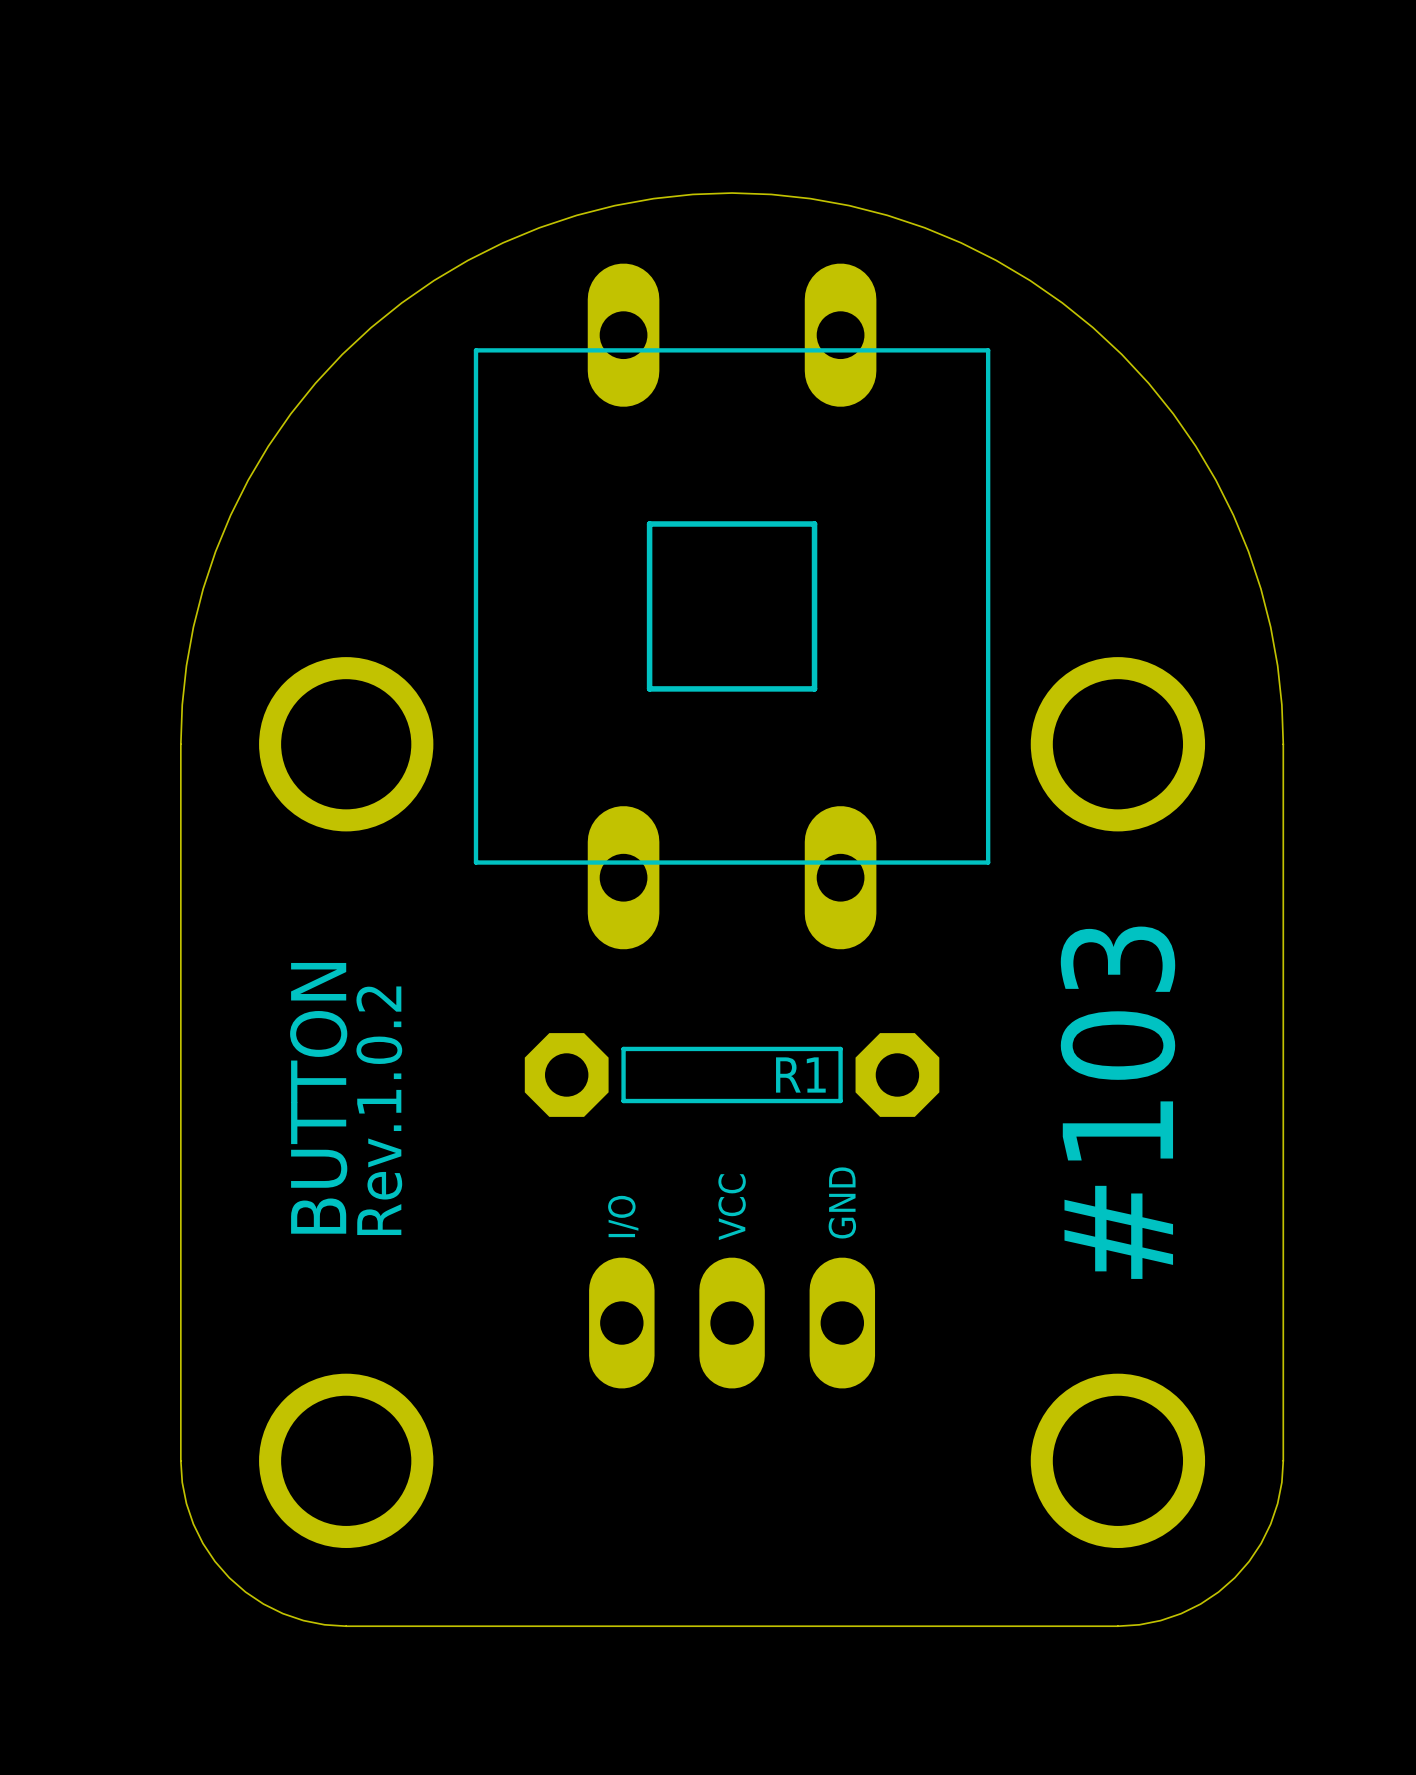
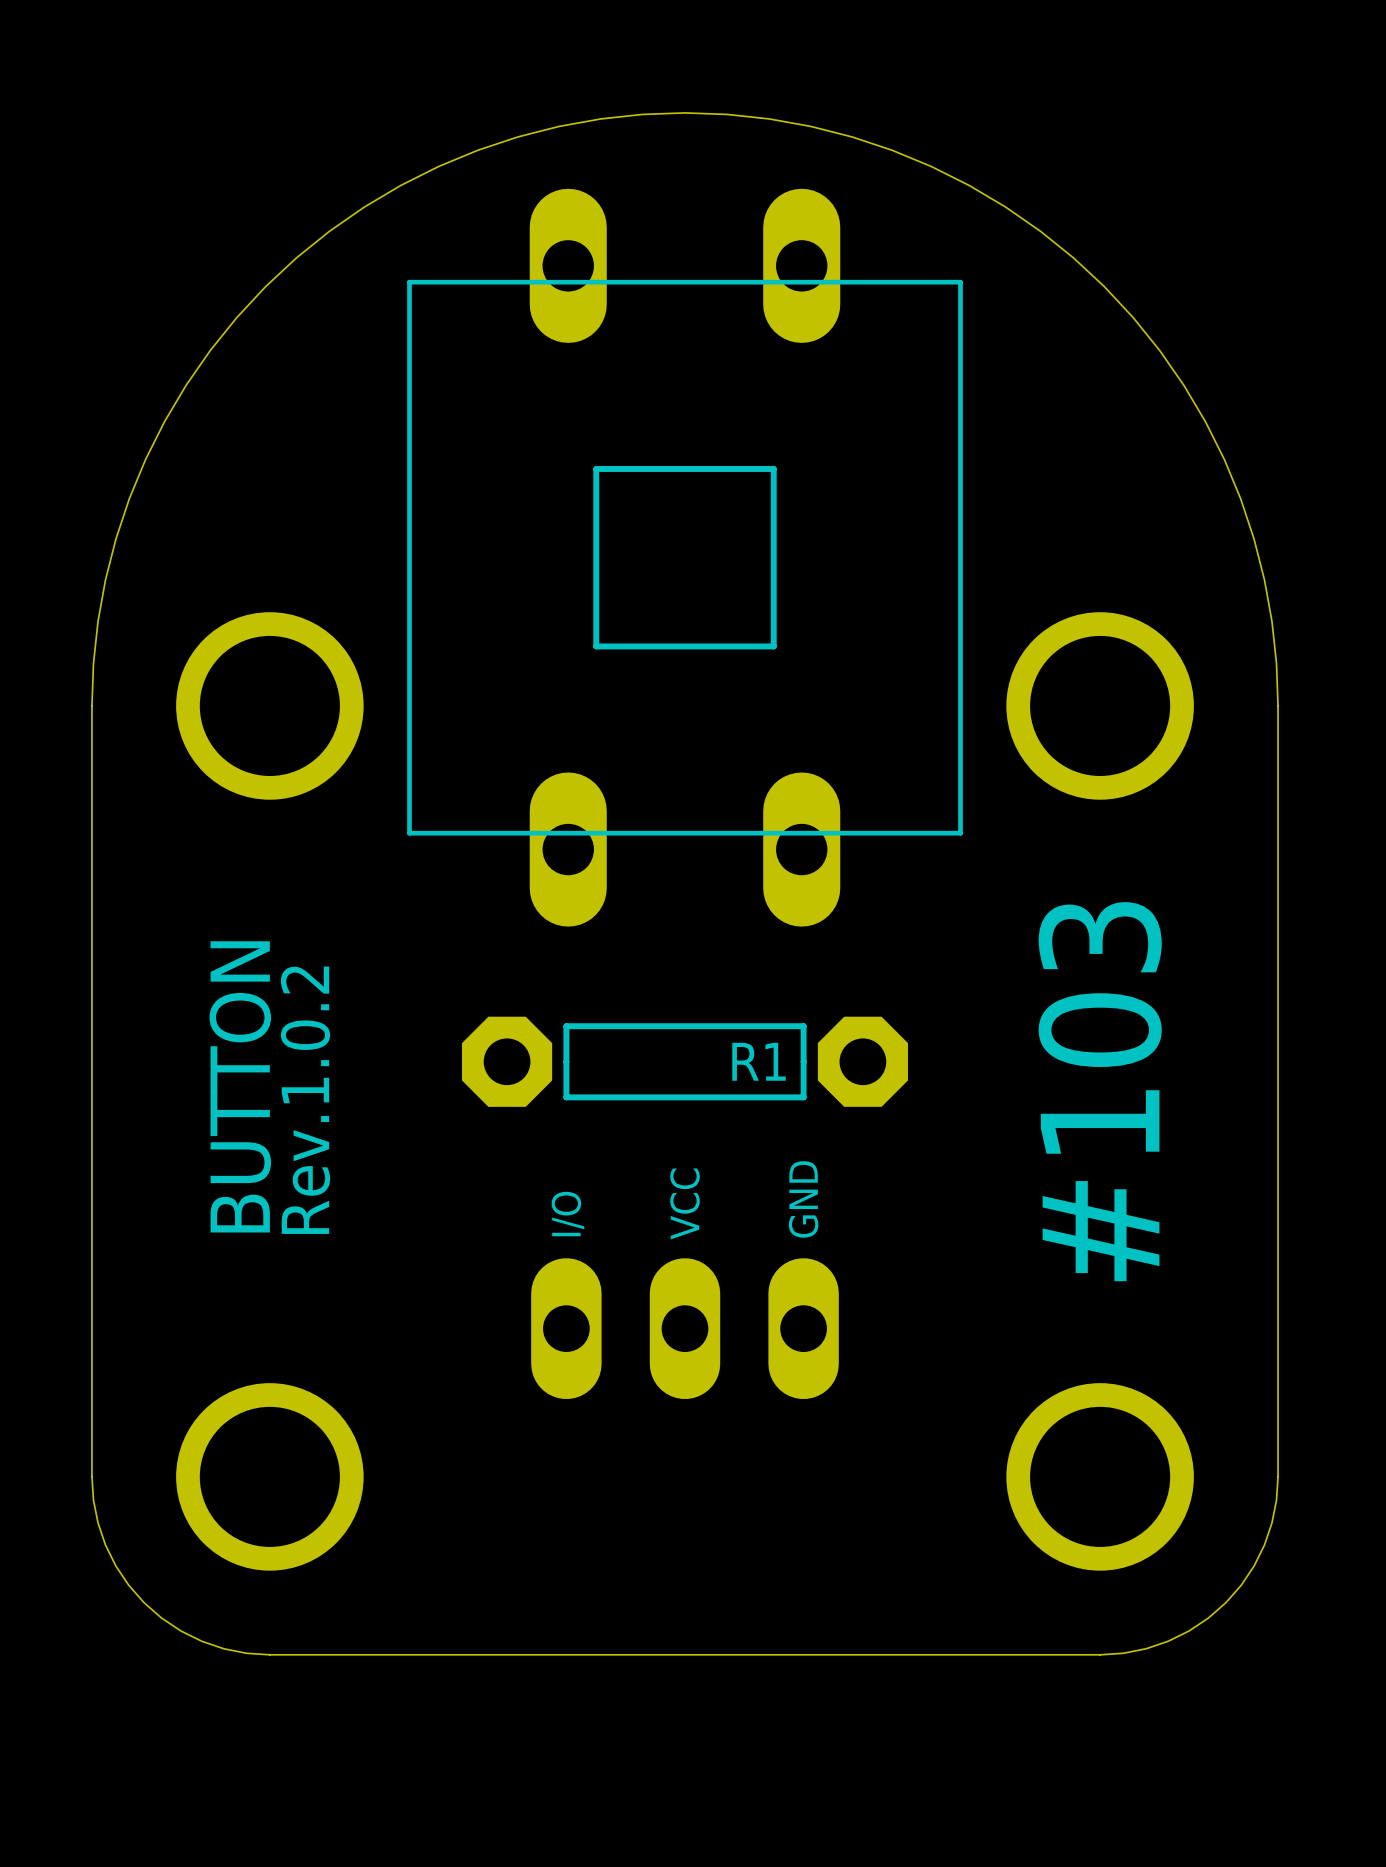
R1 footprint: [524, 1033, 940, 1117] -> [462, 1016, 908, 1107]

